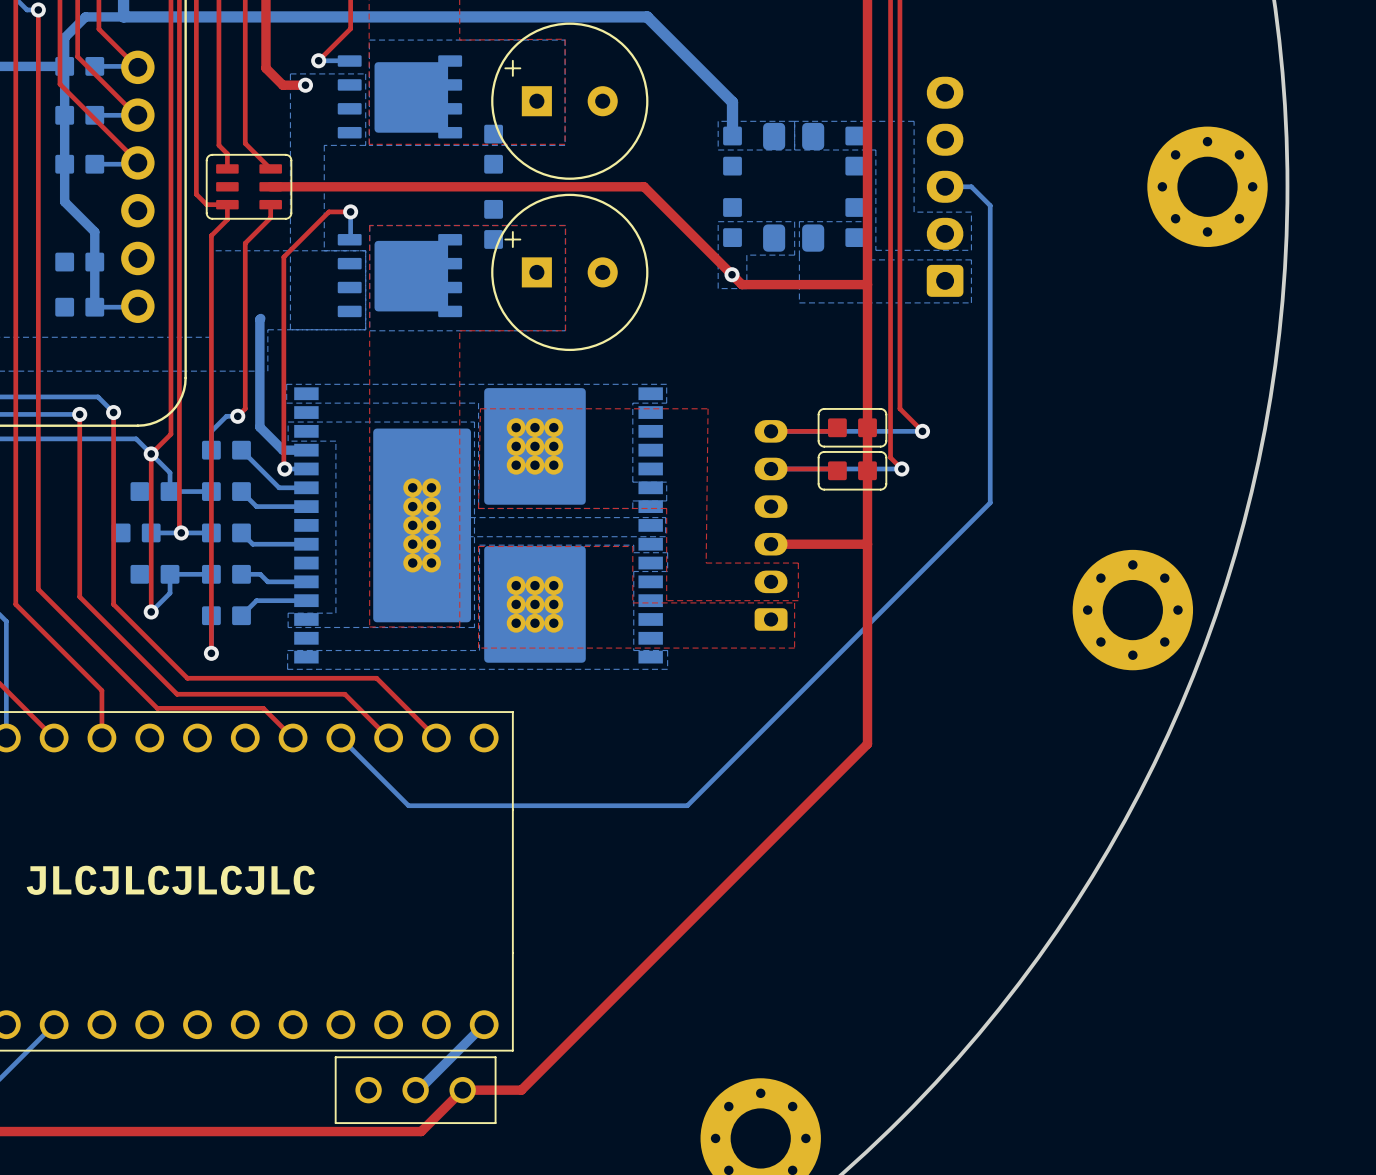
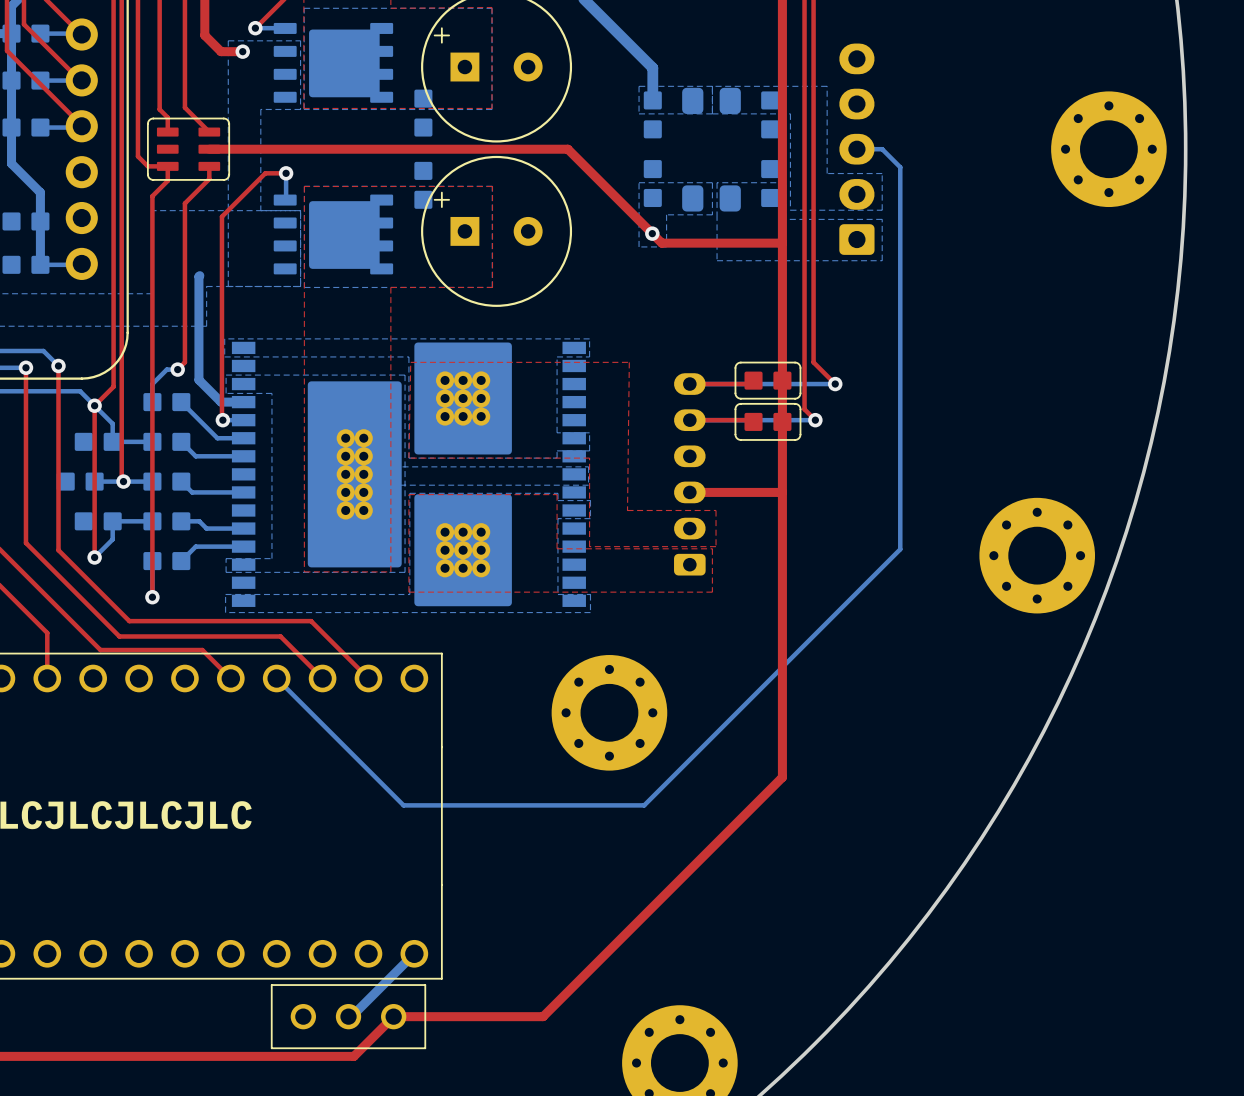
bottom track: (990, 502) (687, 805) (408, 805) -> (900, 452) (900, 549) (644, 805) (403, 805) (341, 743)
top track: (867, 744) (521, 1090) -> (782, 684) (782, 777) (543, 1016) (450, 1016)
part: none -> (609, 712)

